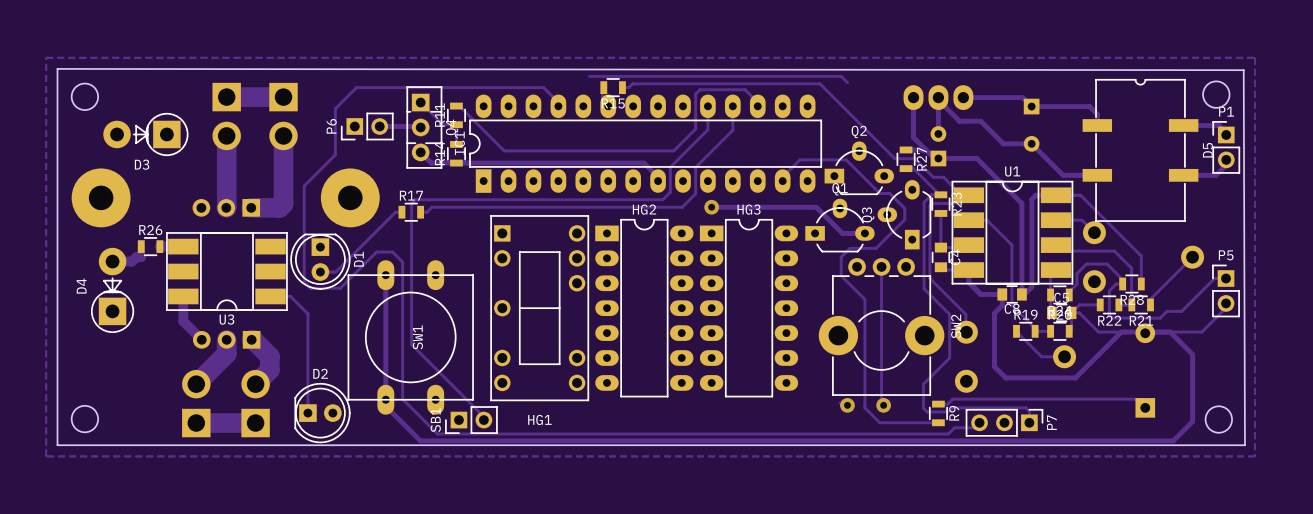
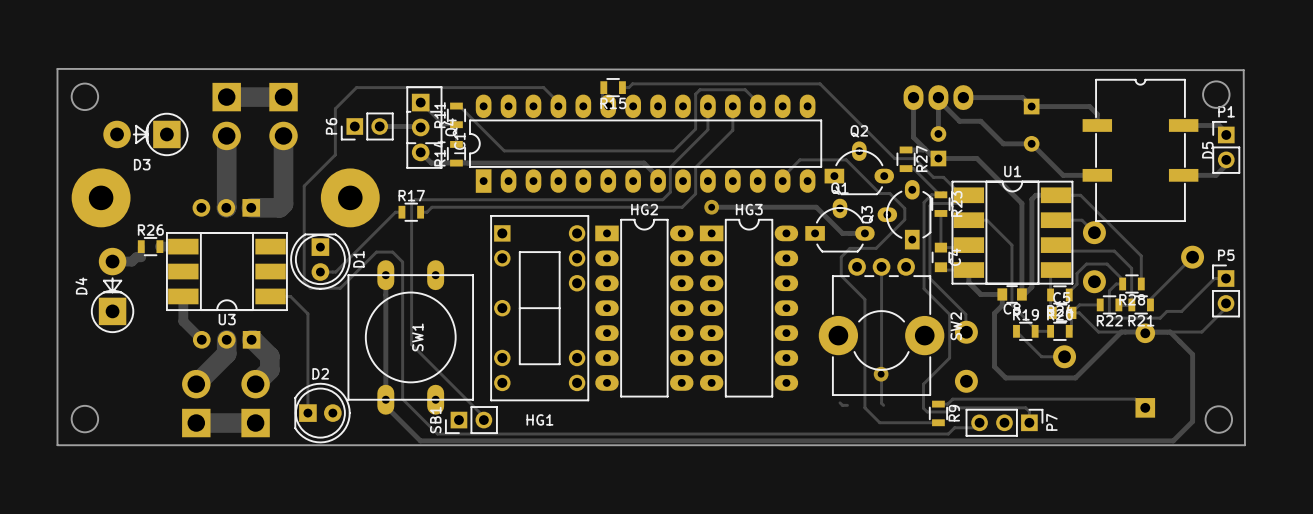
zone outline: (46, 57) (1254, 57) (1254, 456) (46, 456) (46, 57) -> none
track: (589, 76) (841, 76) (847, 82) -> none
via: none -> (881, 374)
via: (847, 405) -> none
via: (883, 405) -> none

